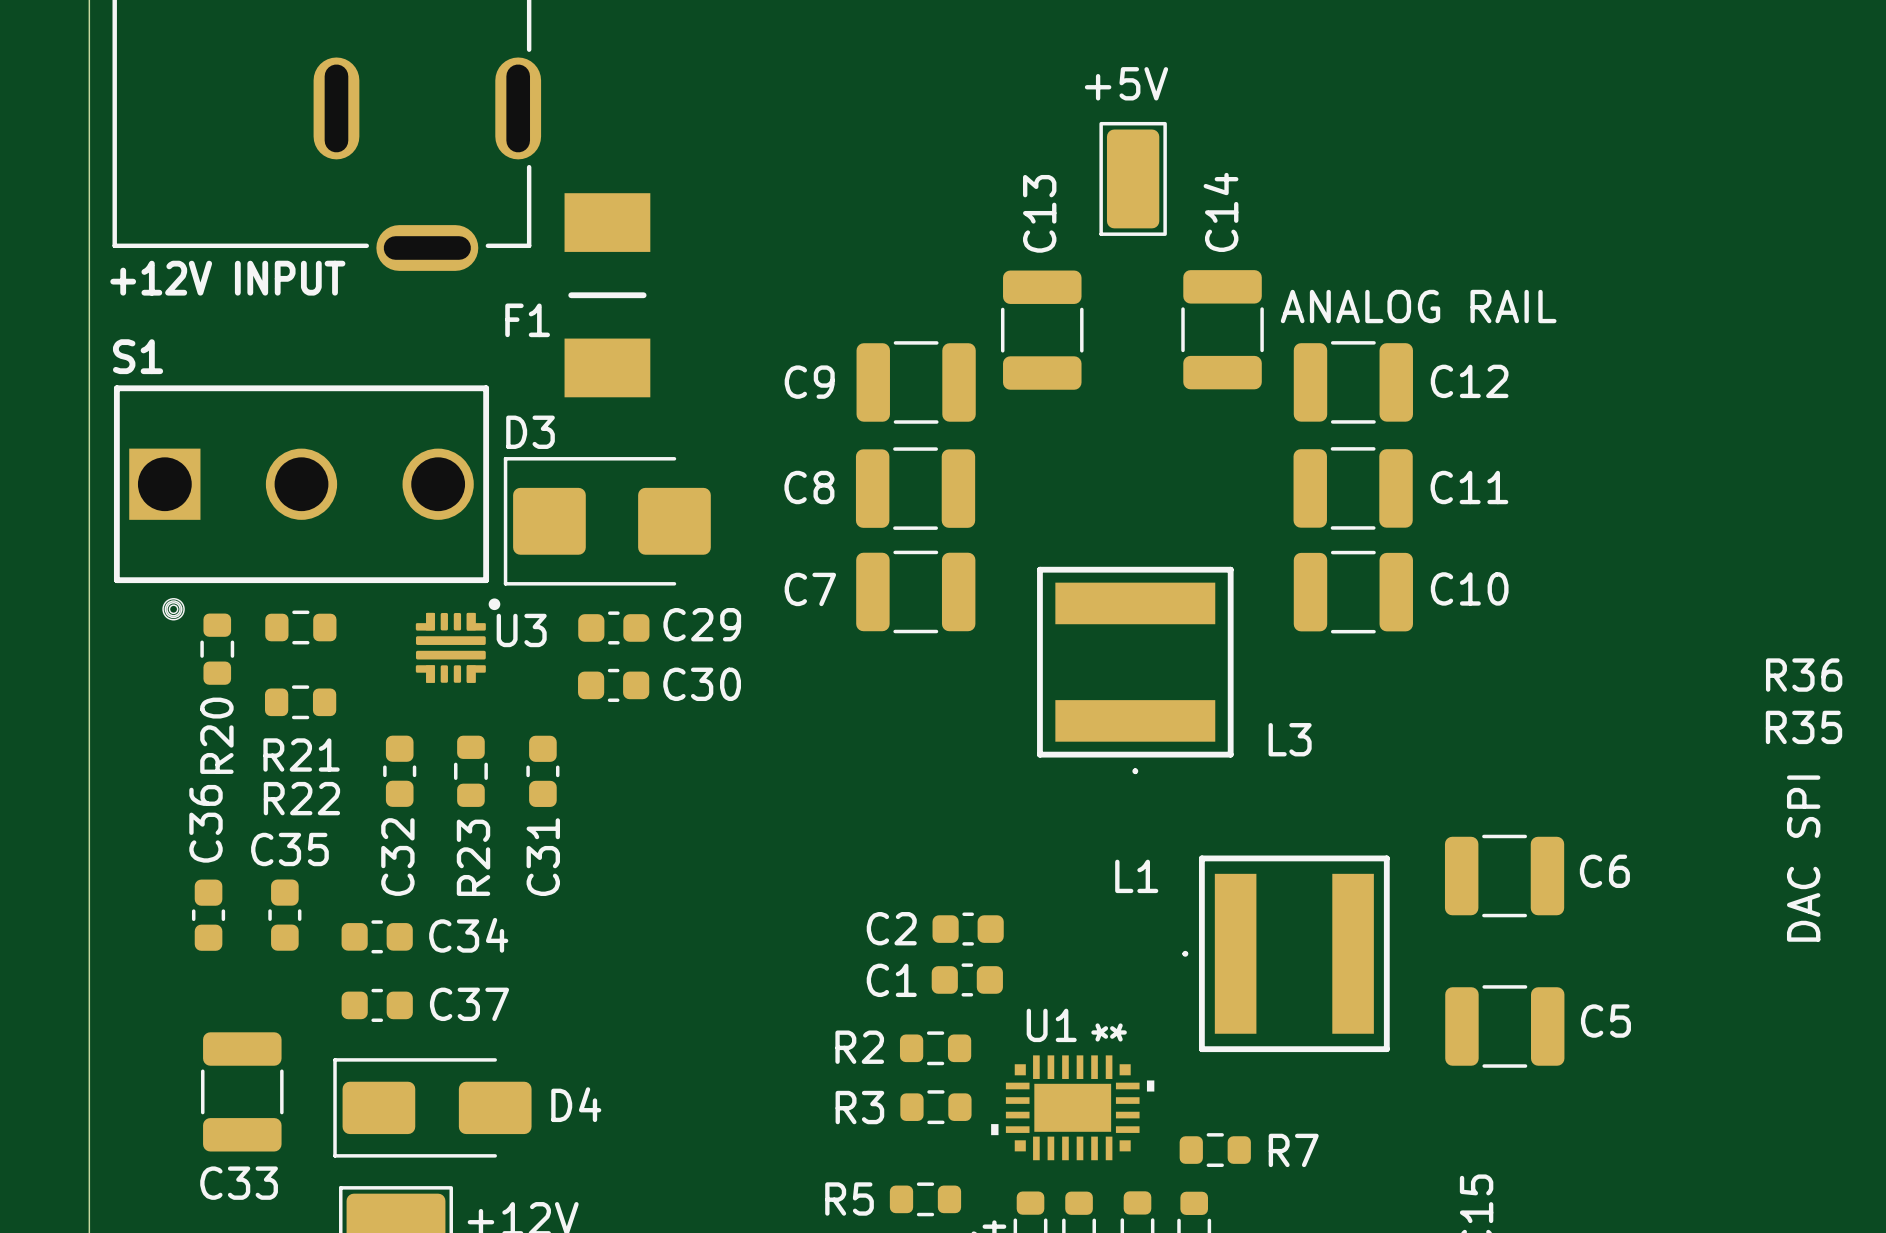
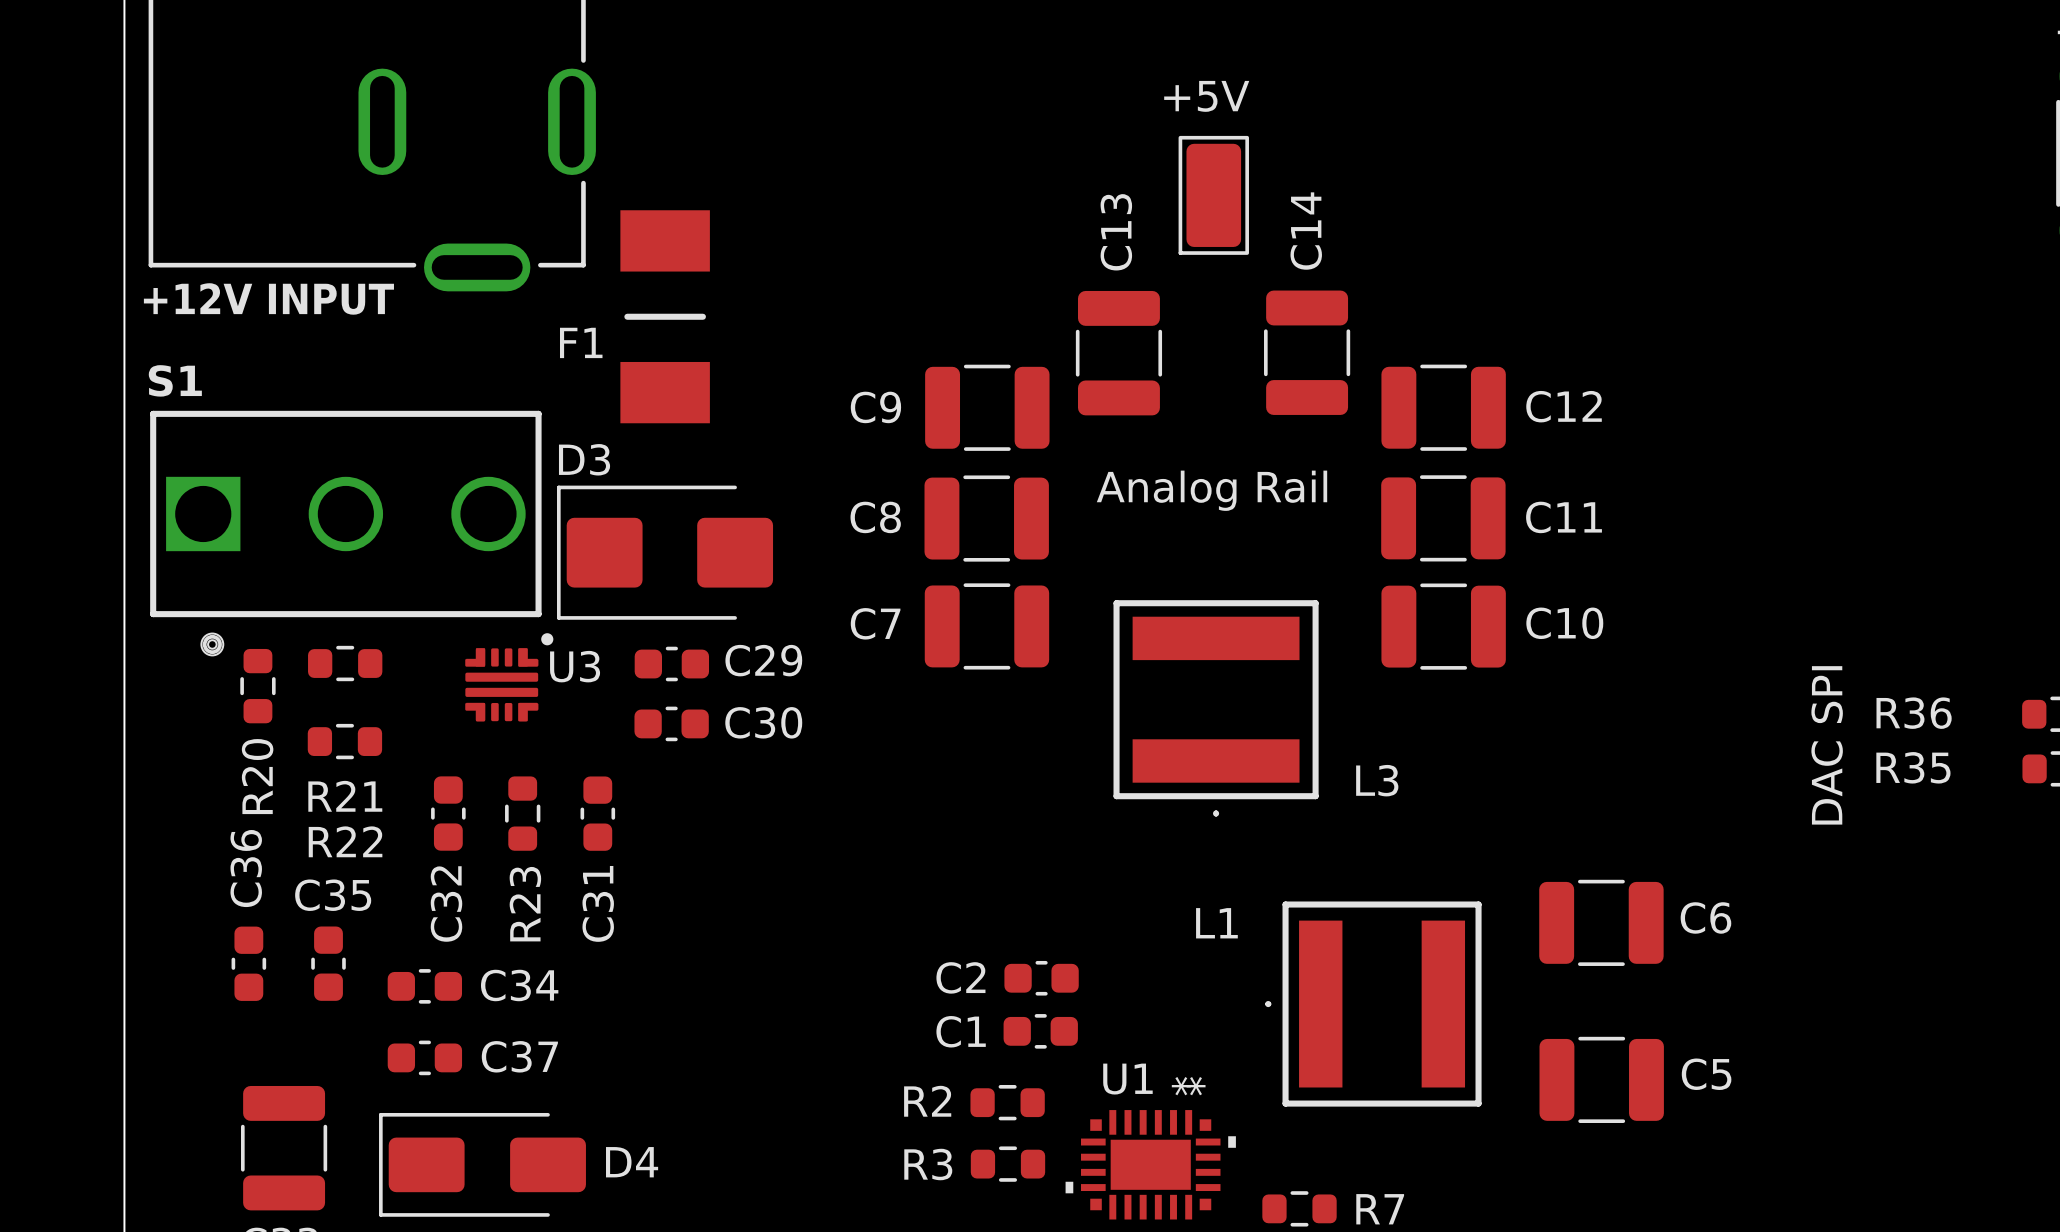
text: ANALOG RAIL (1418, 306) -> none
text: none -> Analog Rail (1211, 490)
text position: DAC SPI (1803, 858) -> DAC SPI (1827, 745)

